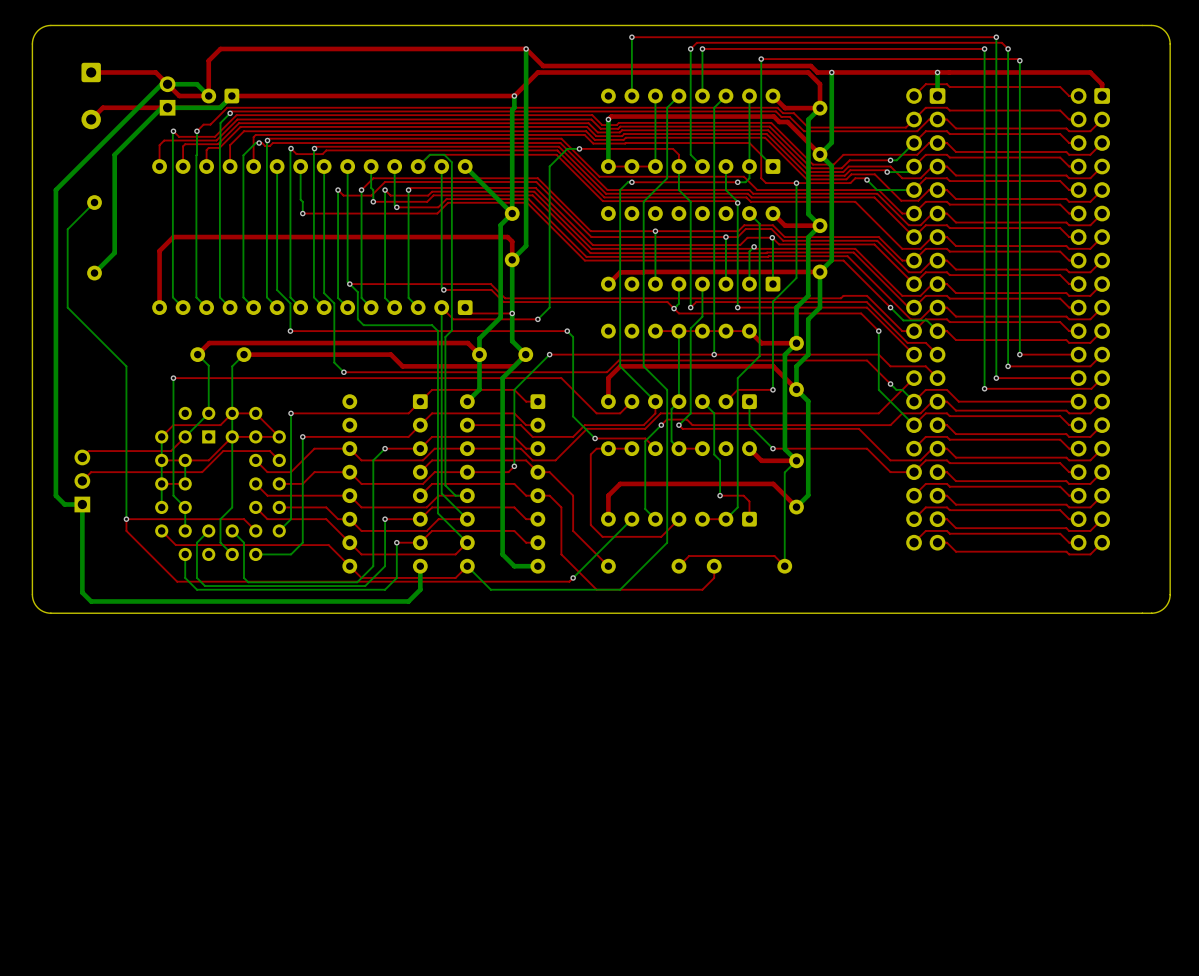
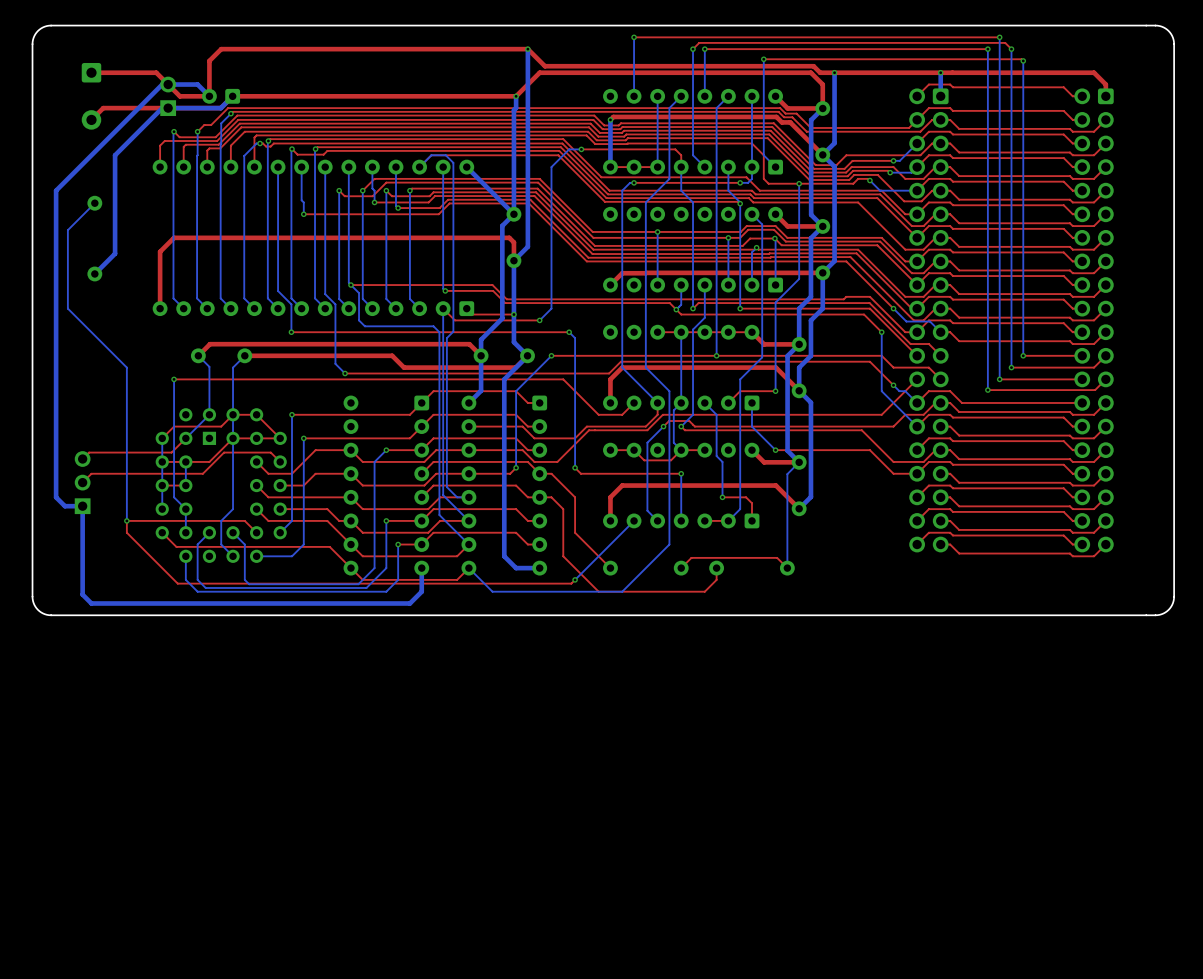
bottom track: (573, 416) (595, 438) -> (575, 417) (575, 467)
top track: (595, 438) (645, 438) (655, 448) -> none
via position: (595, 438) -> (575, 467)
top track: (608, 448) (596, 448) (590, 454) (590, 525) (602, 536) (661, 536) (678, 519) -> none
top track: none -> (681, 450) (671, 460) (644, 460) (634, 450) (630, 450)
top track: none -> (575, 467) (580, 473) (681, 473)
bottom track: none -> (681, 473) (681, 520)
via: none -> (681, 473)

